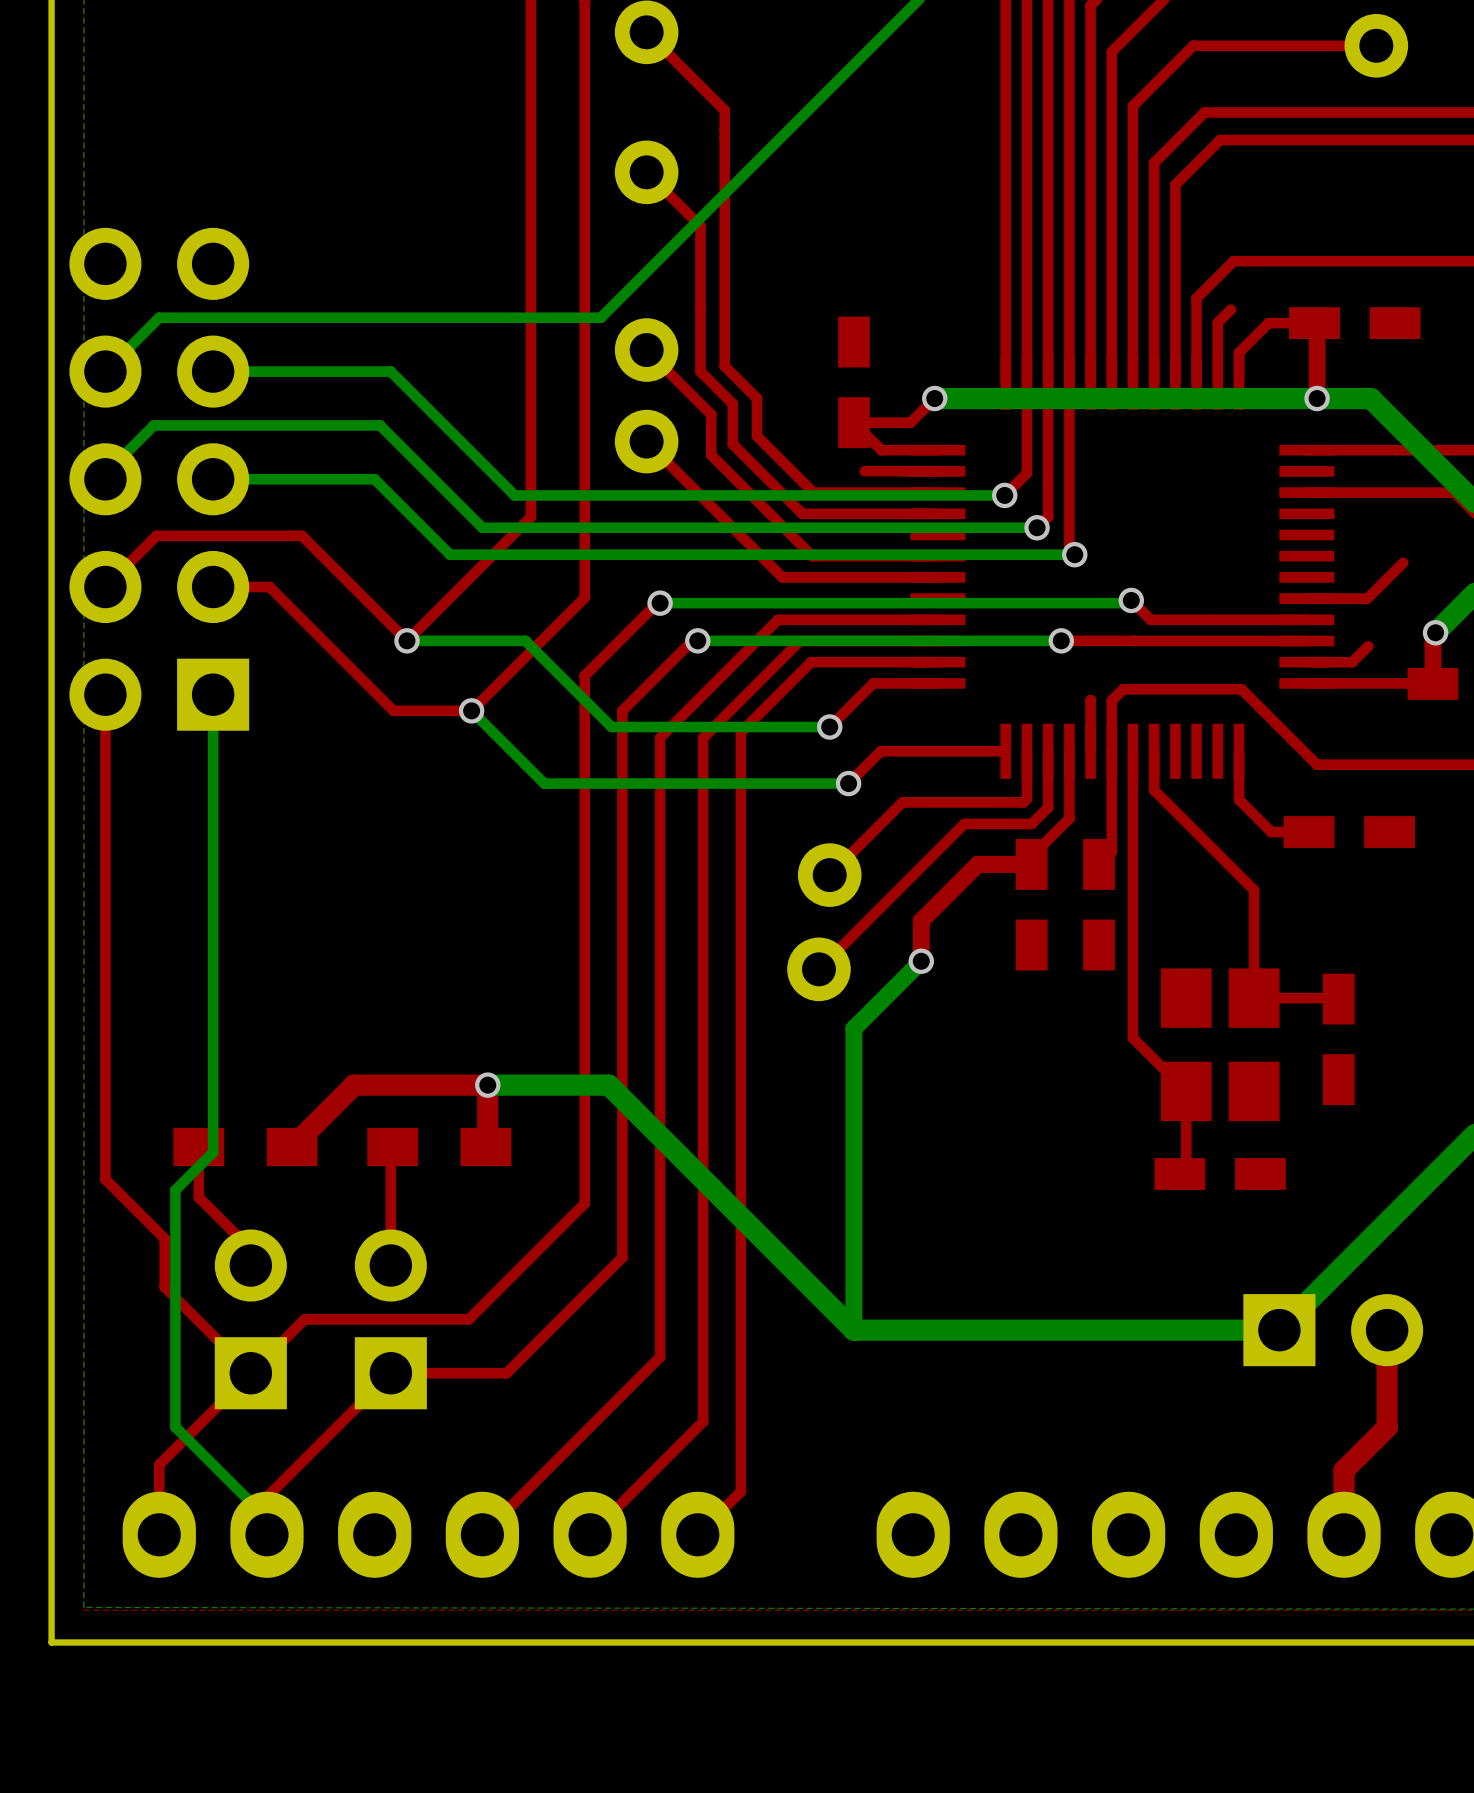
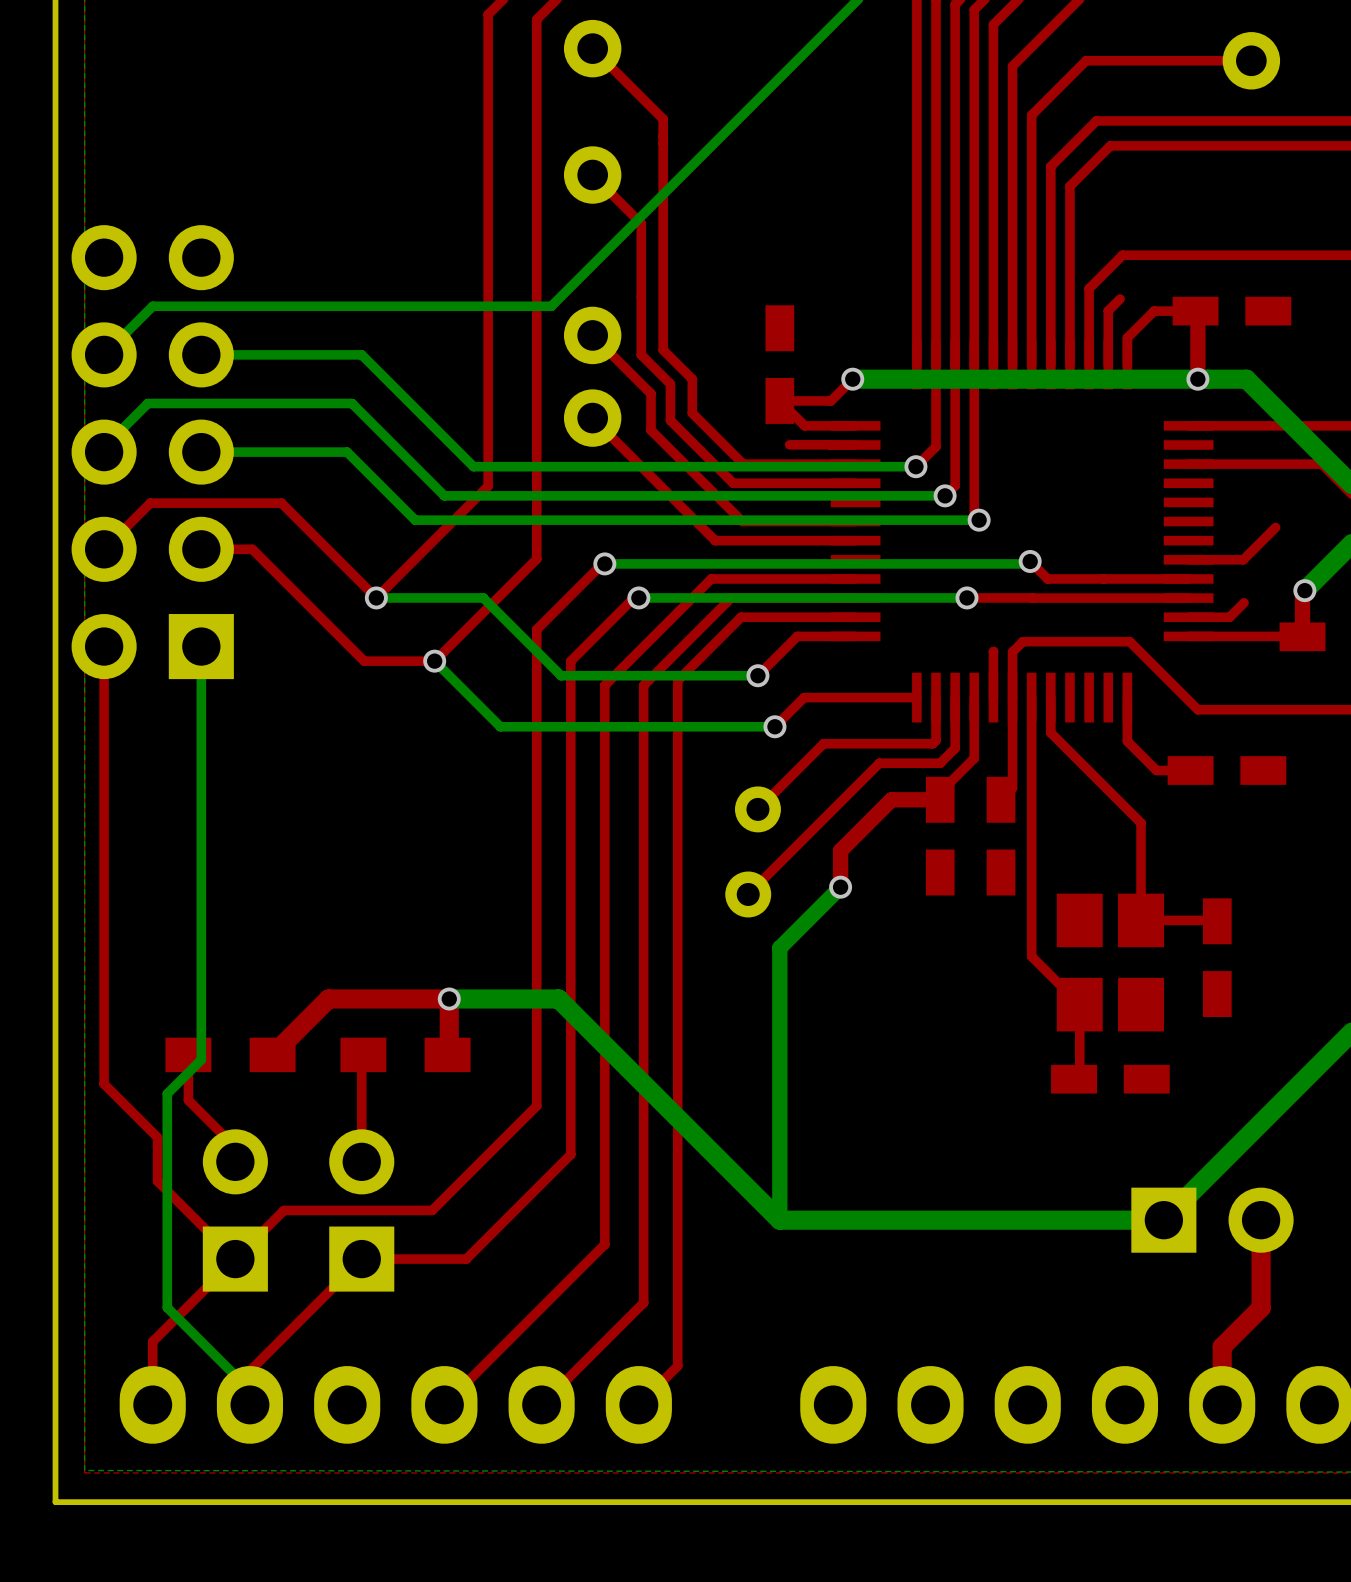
part footprint: [797, 843, 862, 907] -> [734, 786, 781, 833]
part footprint: [787, 937, 851, 1002] -> [725, 871, 772, 918]

